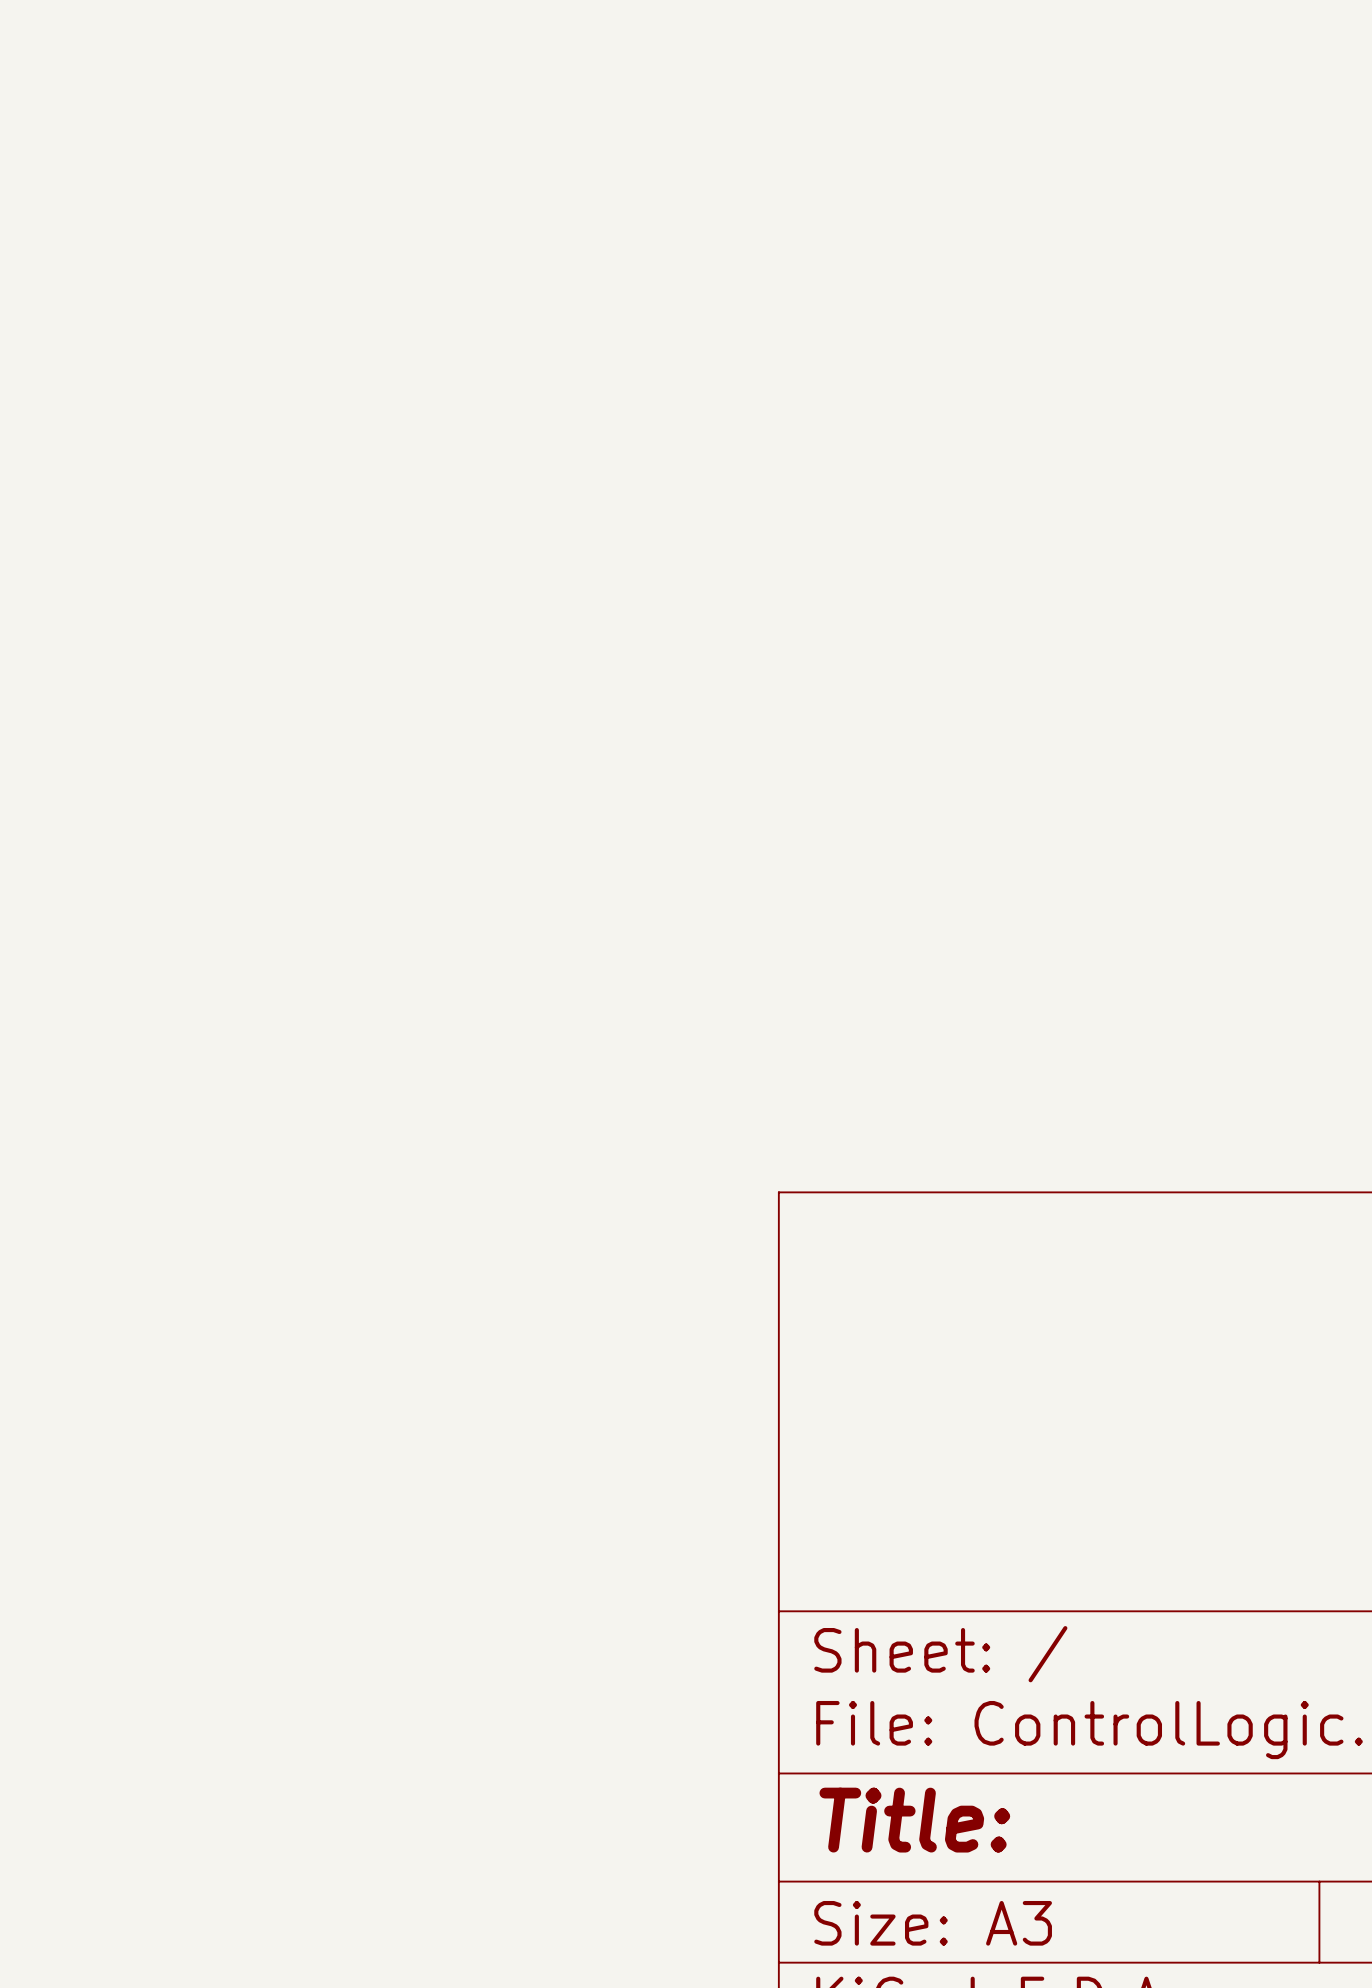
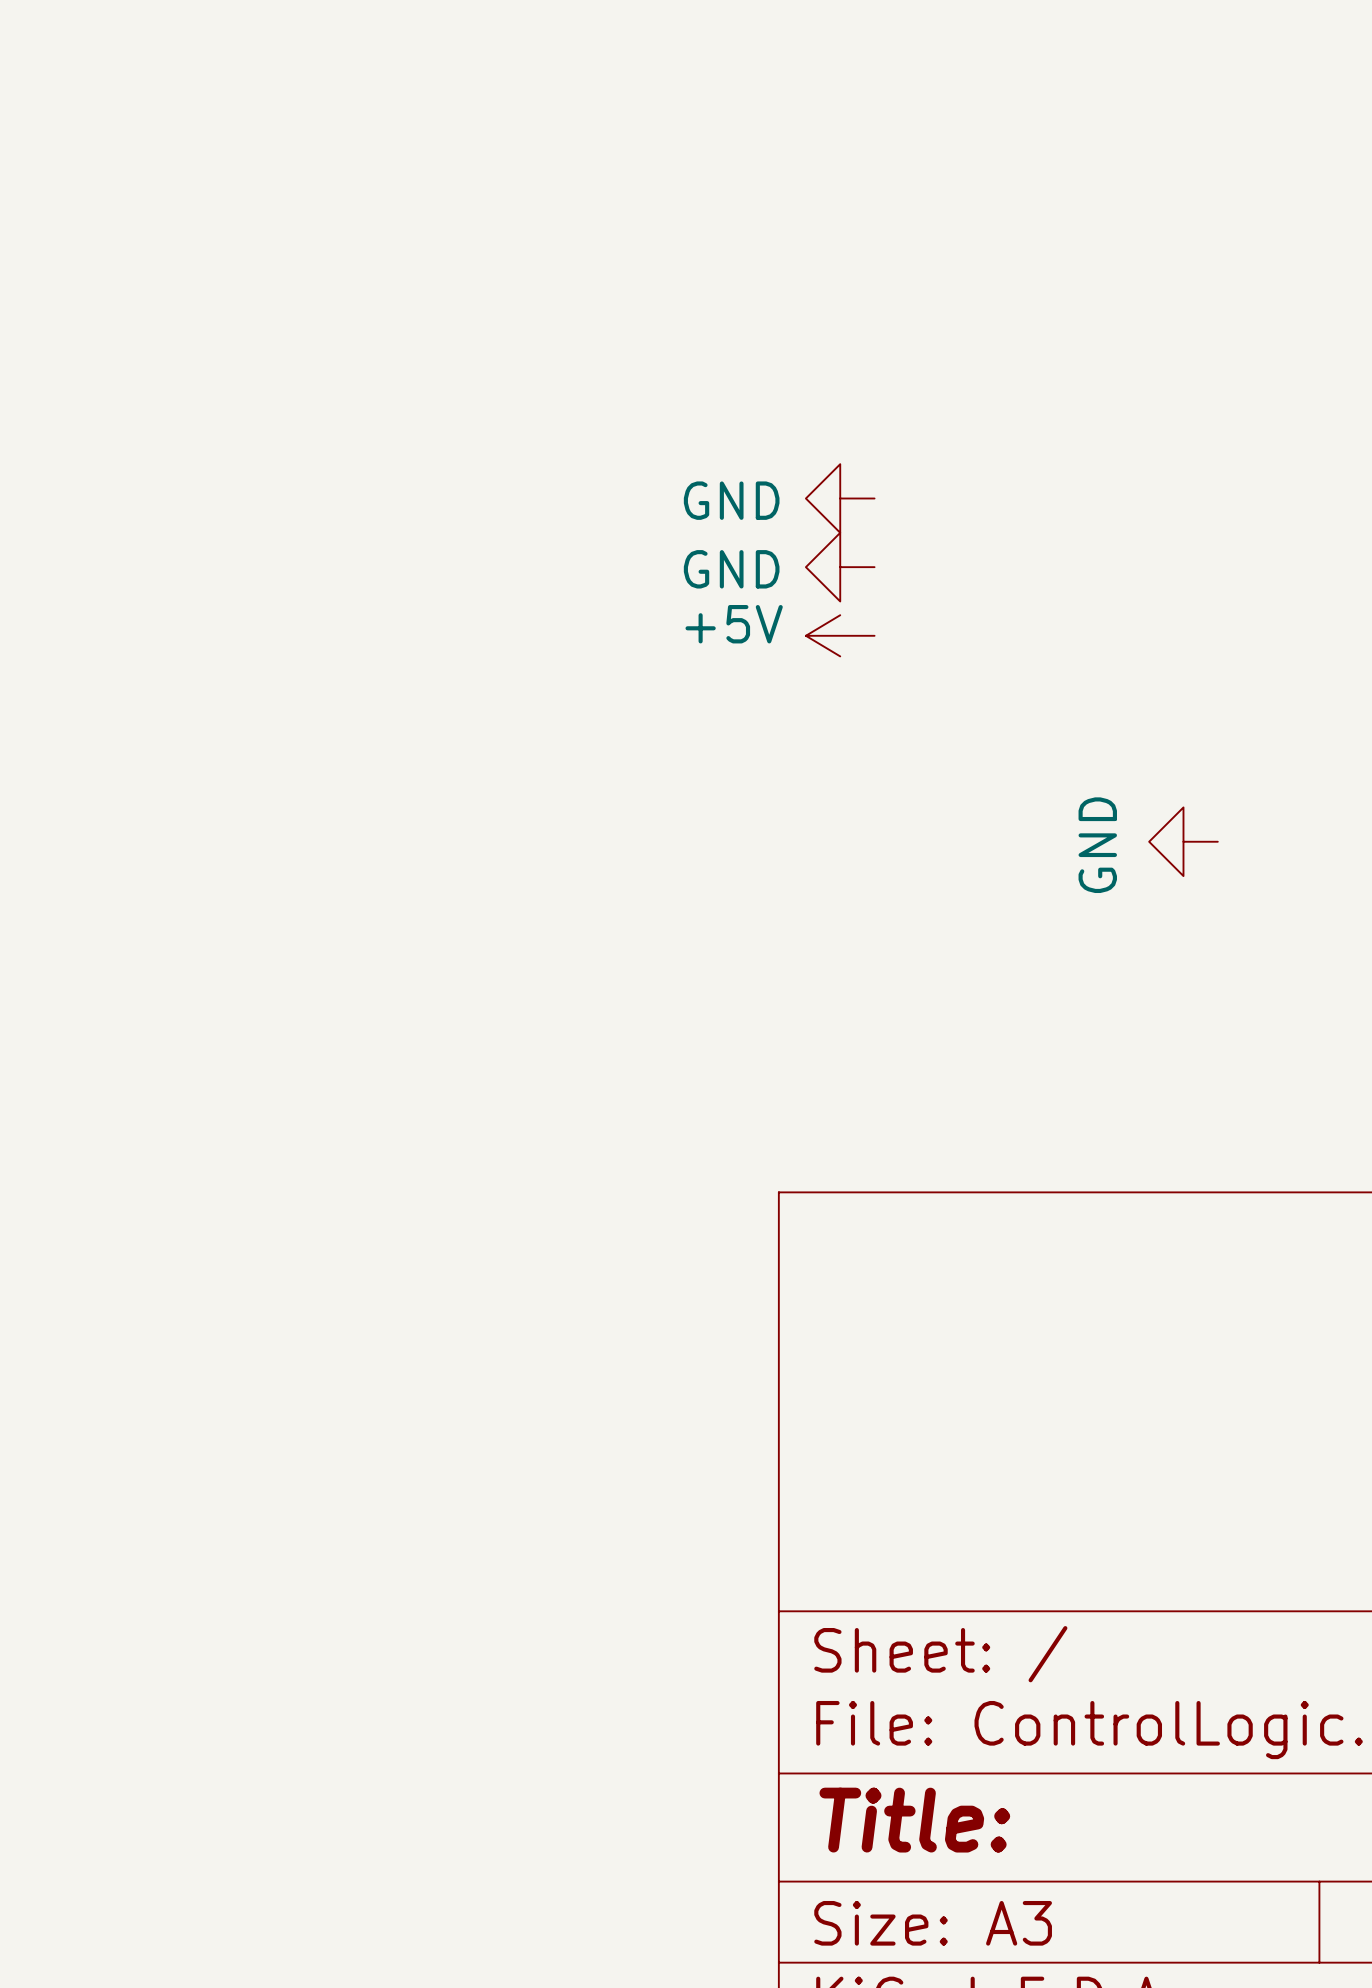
power symbol: none -> GND (840, 498)
power symbol: none -> GND (840, 567)
power symbol: none -> +5V (840, 635)
power symbol: none -> GND (1183, 841)

